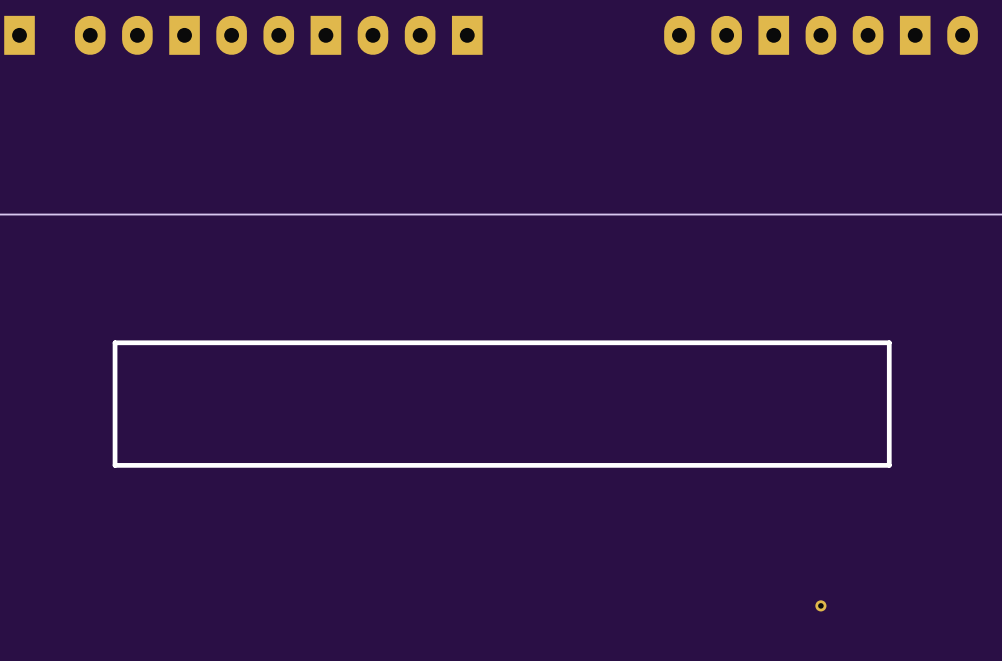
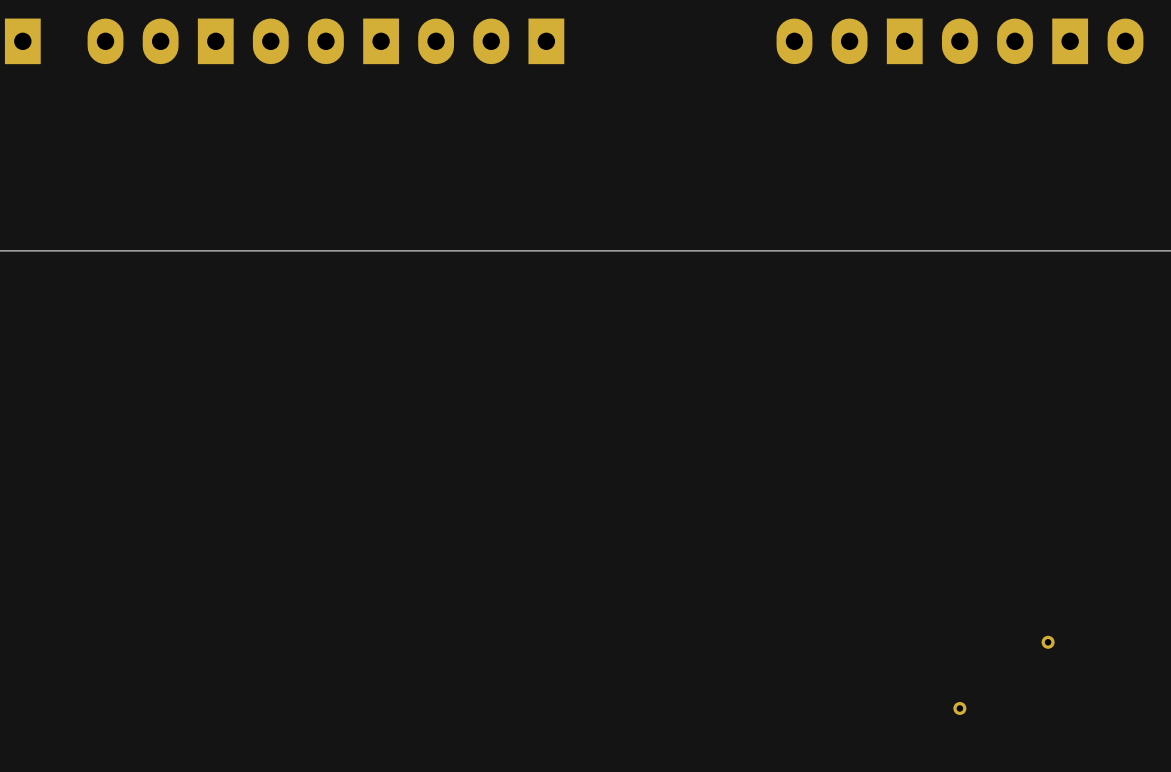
line: (889, 342) (889, 465) (115, 465) (115, 342) (889, 342) -> none
part: none -> (1048, 642)

